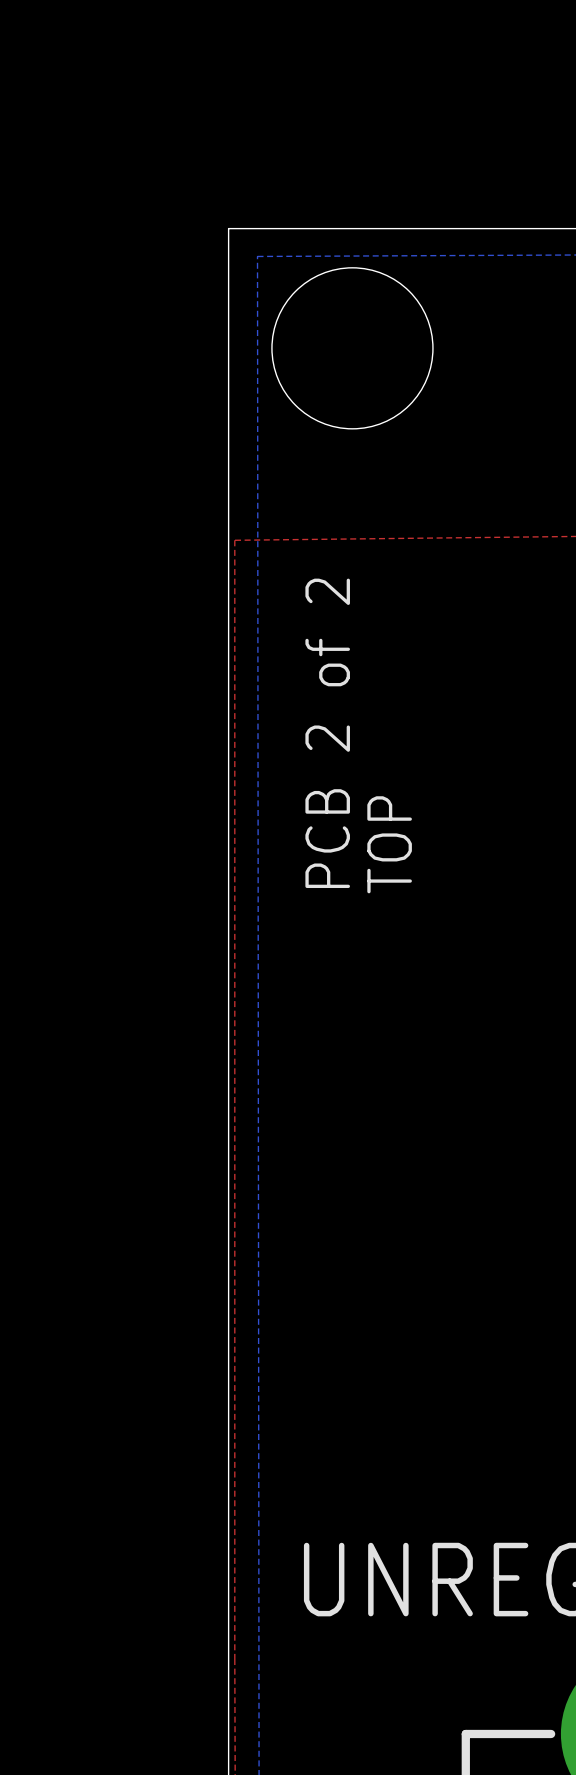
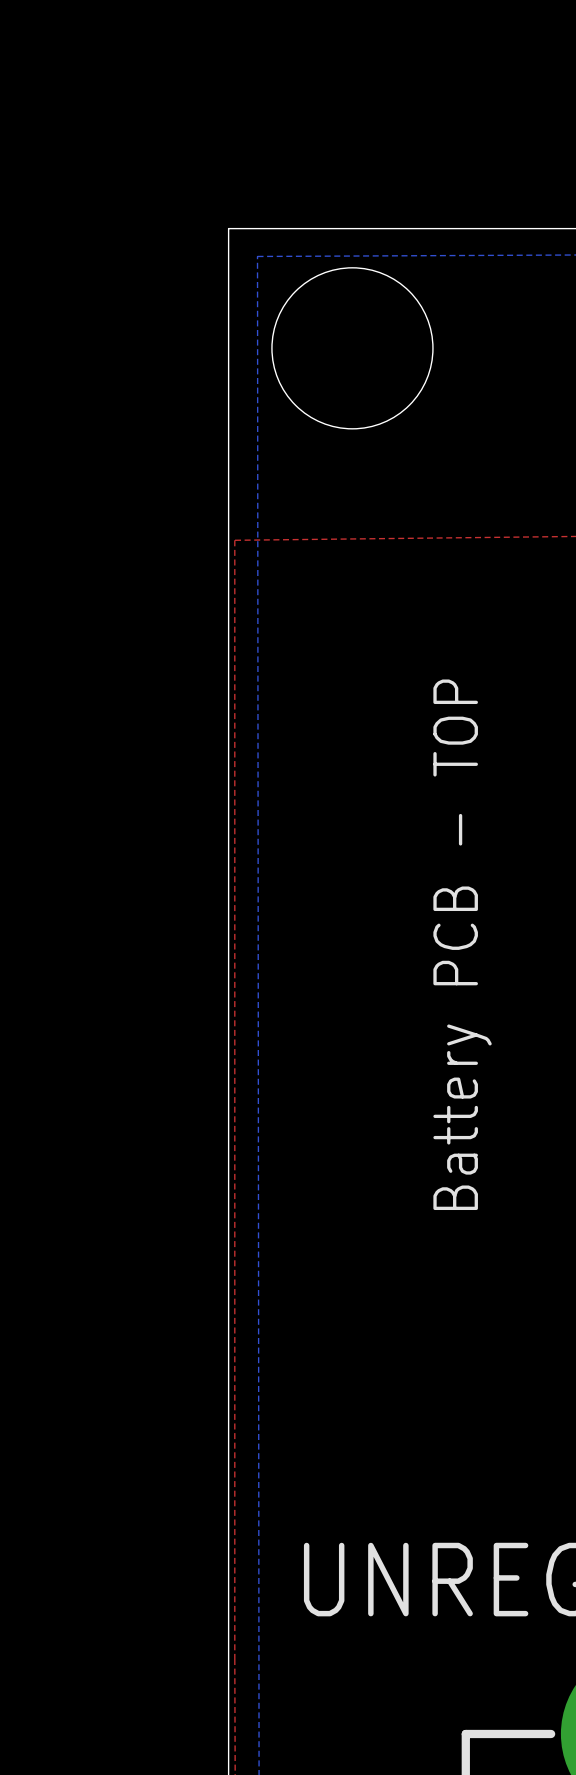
text: PCB 2 of 2 (327, 733) -> none
text: TOP (389, 844) -> none
text: none -> Battery PCB - TOP (462, 944)

